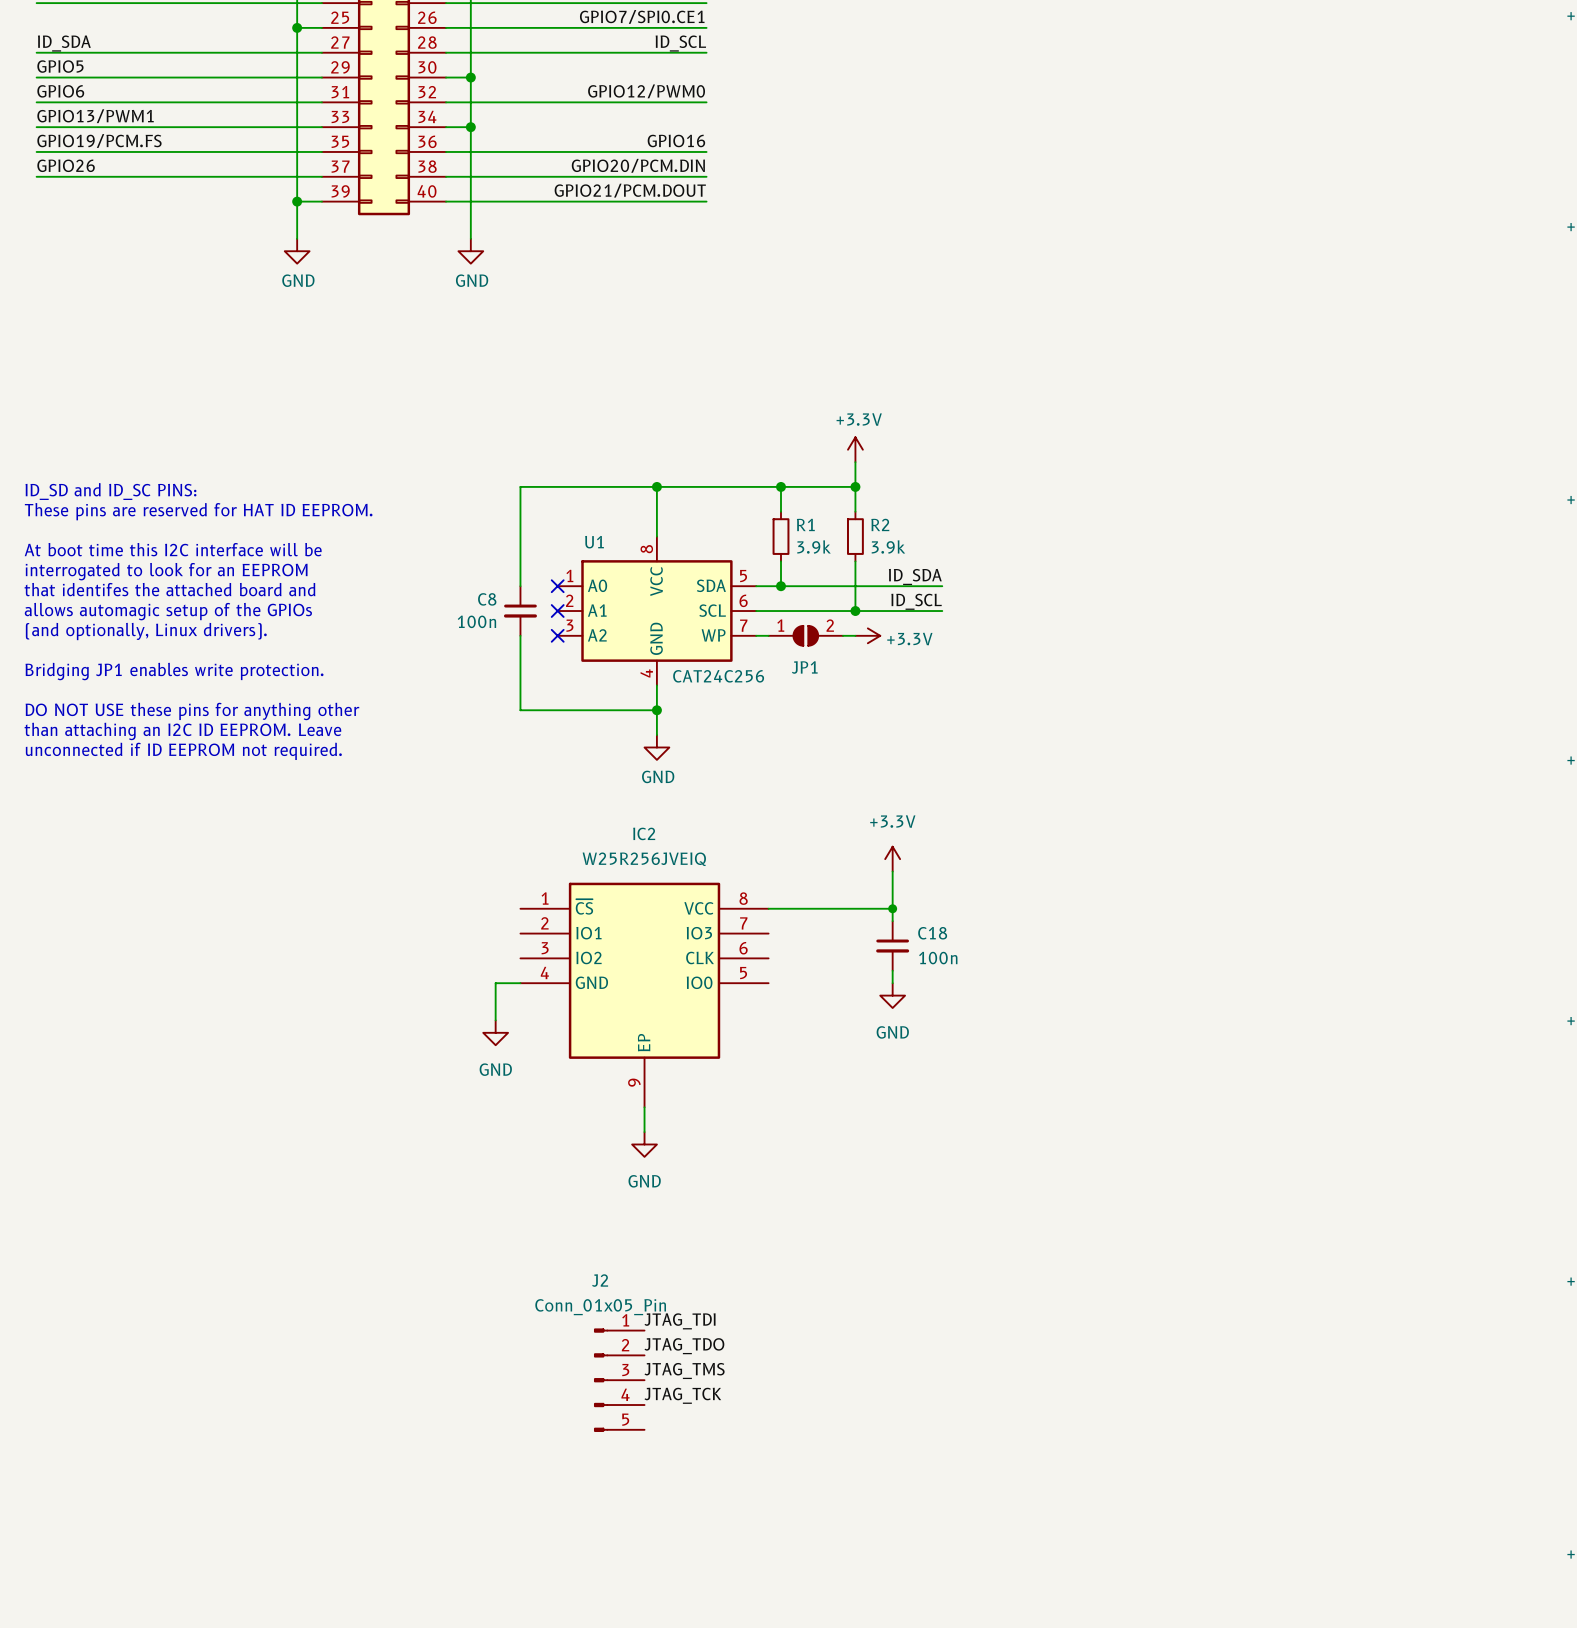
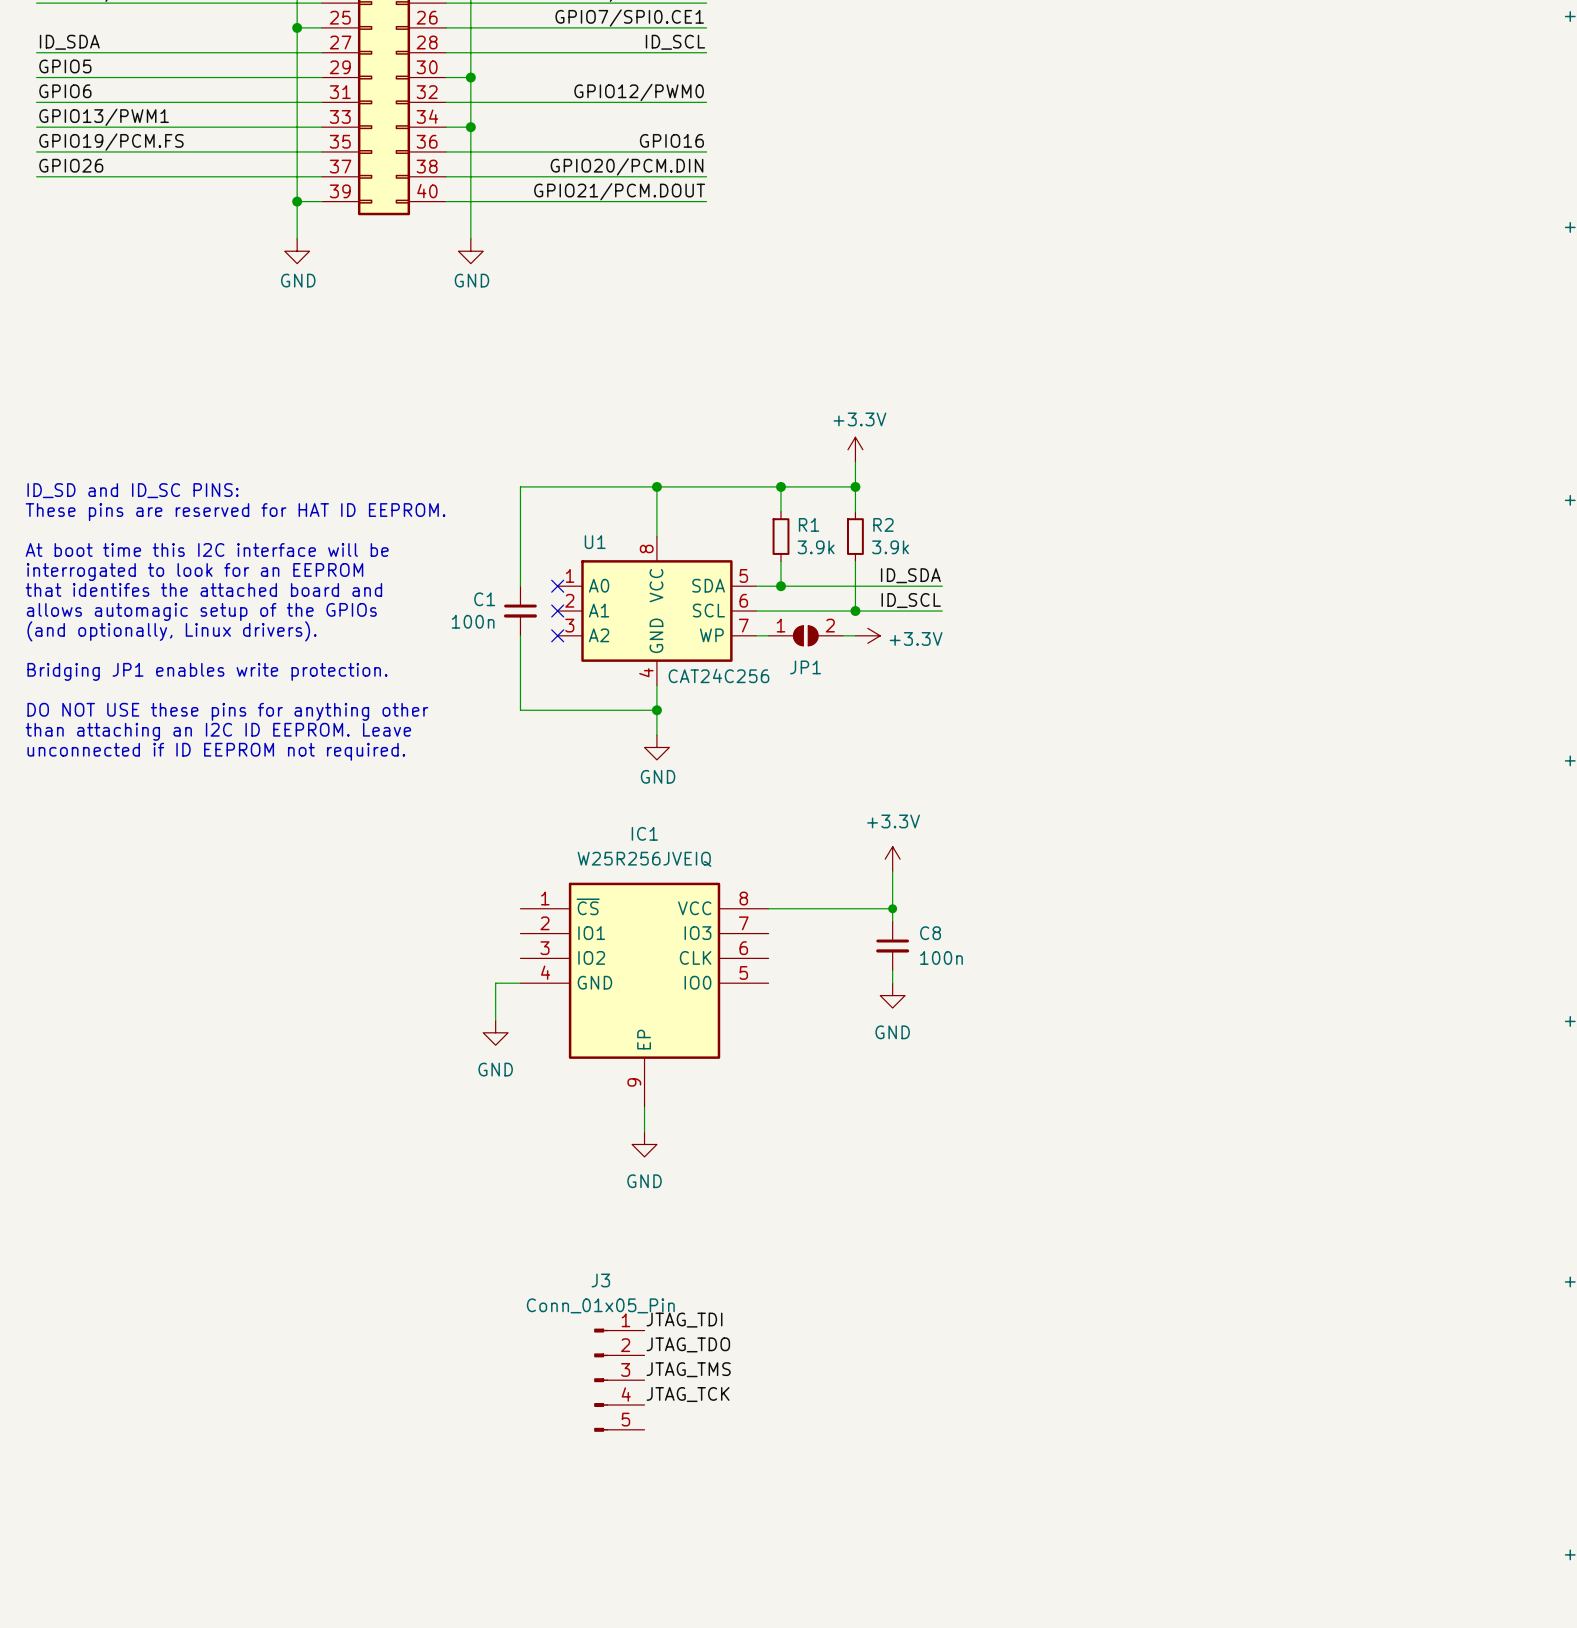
C8 name: C8 (487, 599) -> C1 (484, 599)
IC2 name: IC2 (644, 833) -> IC1 (644, 833)
C18 name: C18 (932, 933) -> C8 (930, 933)
J2 name: J2 (600, 1280) -> J3 (600, 1280)

